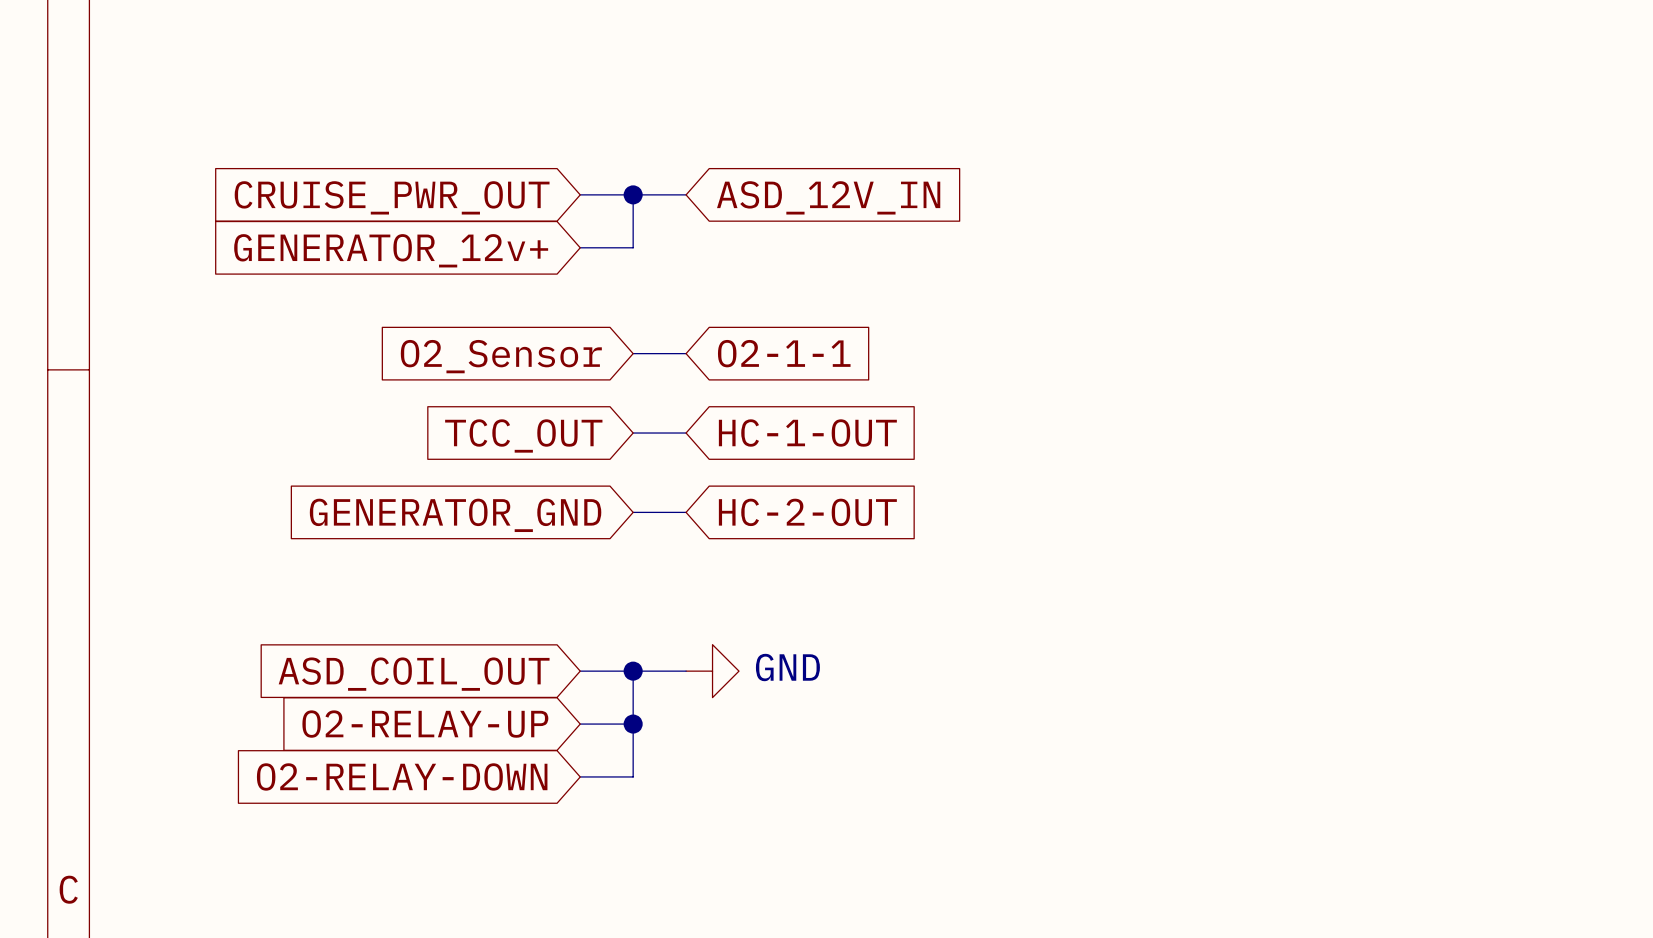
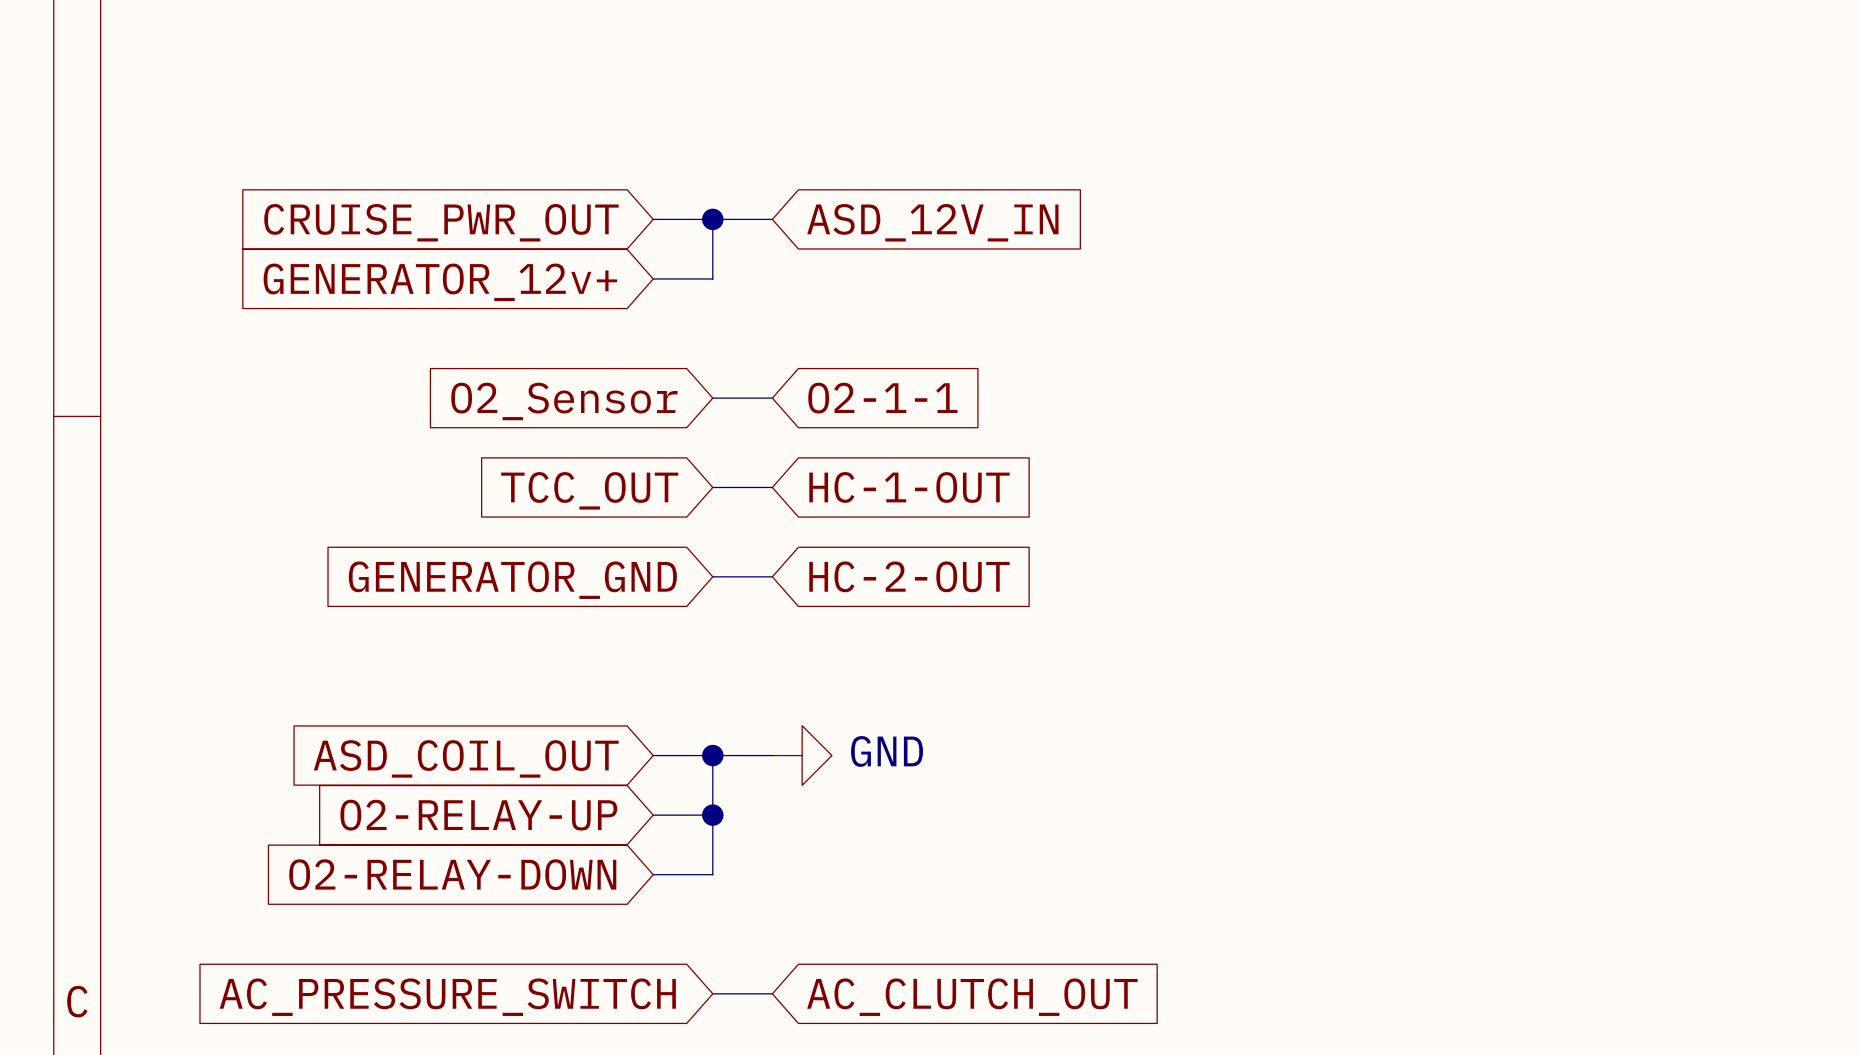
wire: none -> (712, 993) (772, 993)
global label: none -> AC_PRESSURE_SWITCH (447, 997)
global label: none -> AC_CLUTCH_OUT (972, 997)

